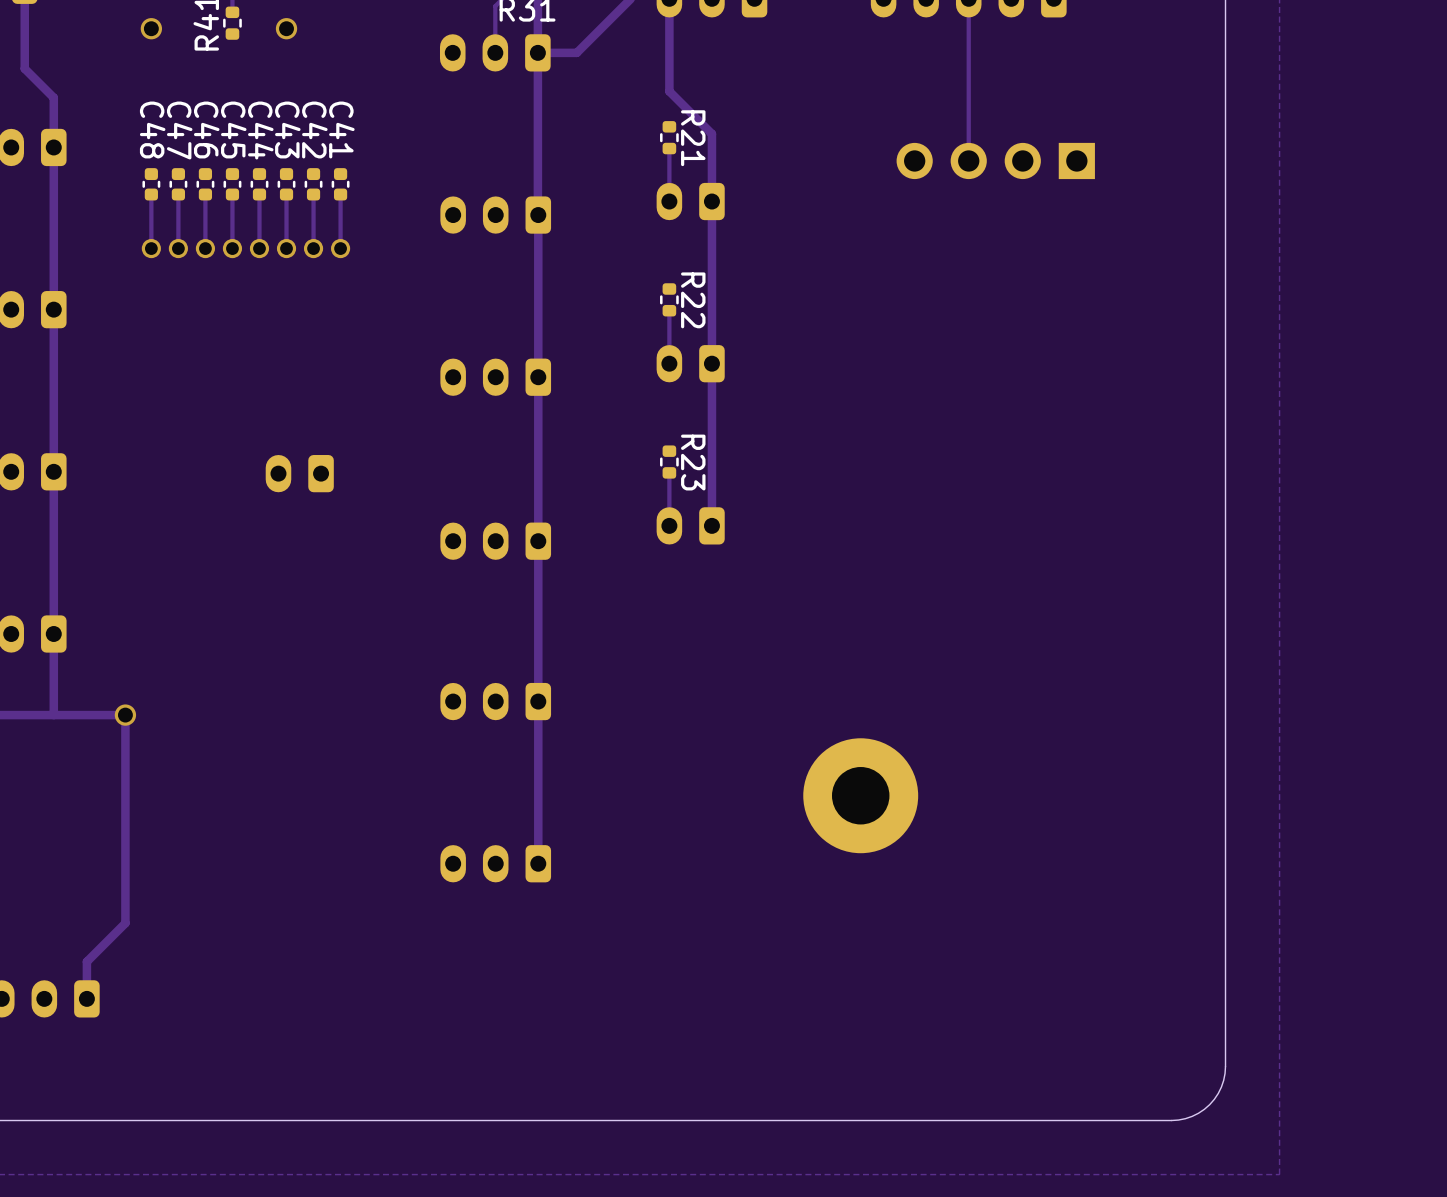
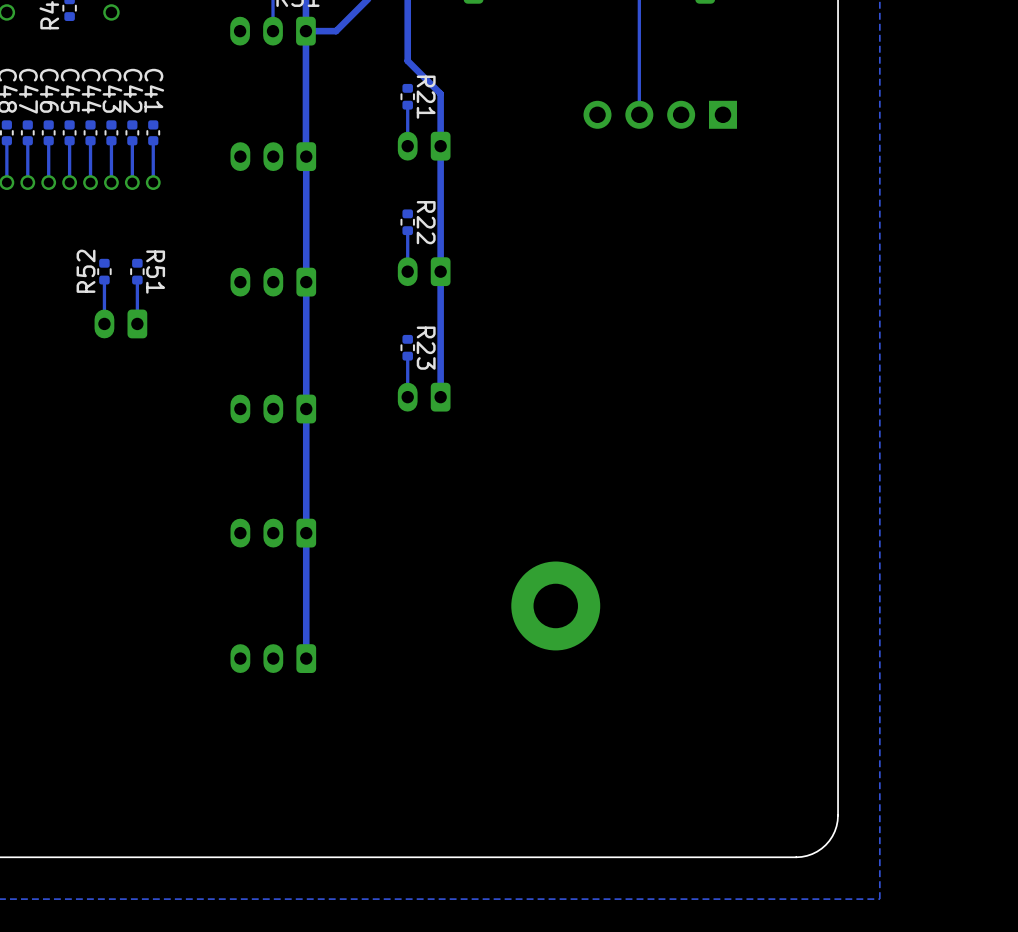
R52: none -> (104, 271)
R51: none -> (137, 271)
track: none -> (104, 280) (104, 323)
track: none -> (137, 280) (137, 323)
part position: (299, 473) -> (120, 323)

